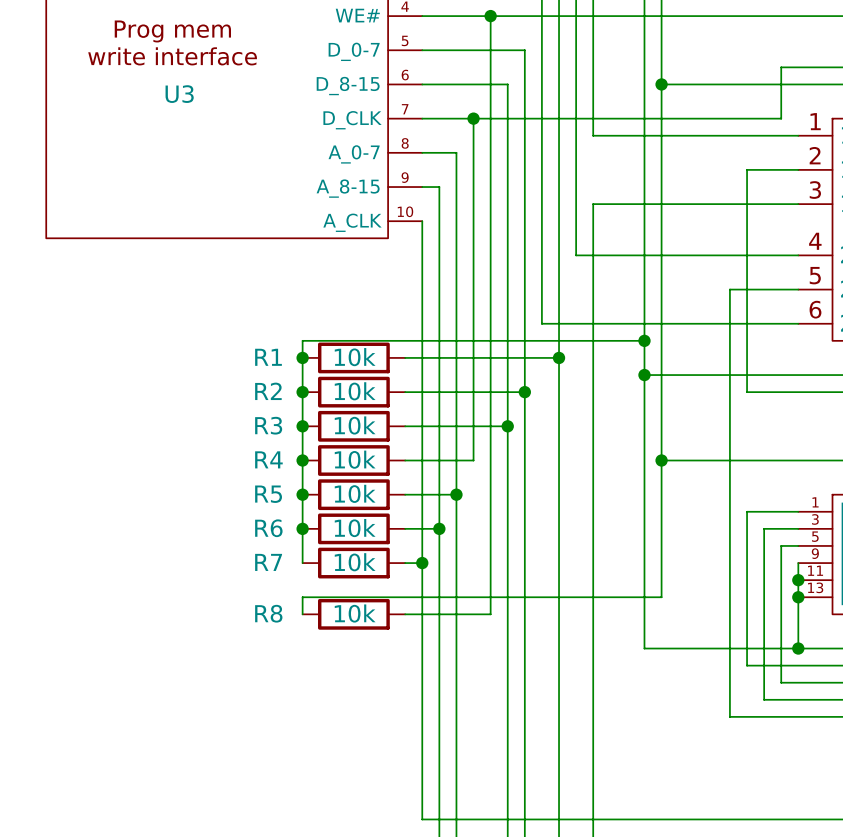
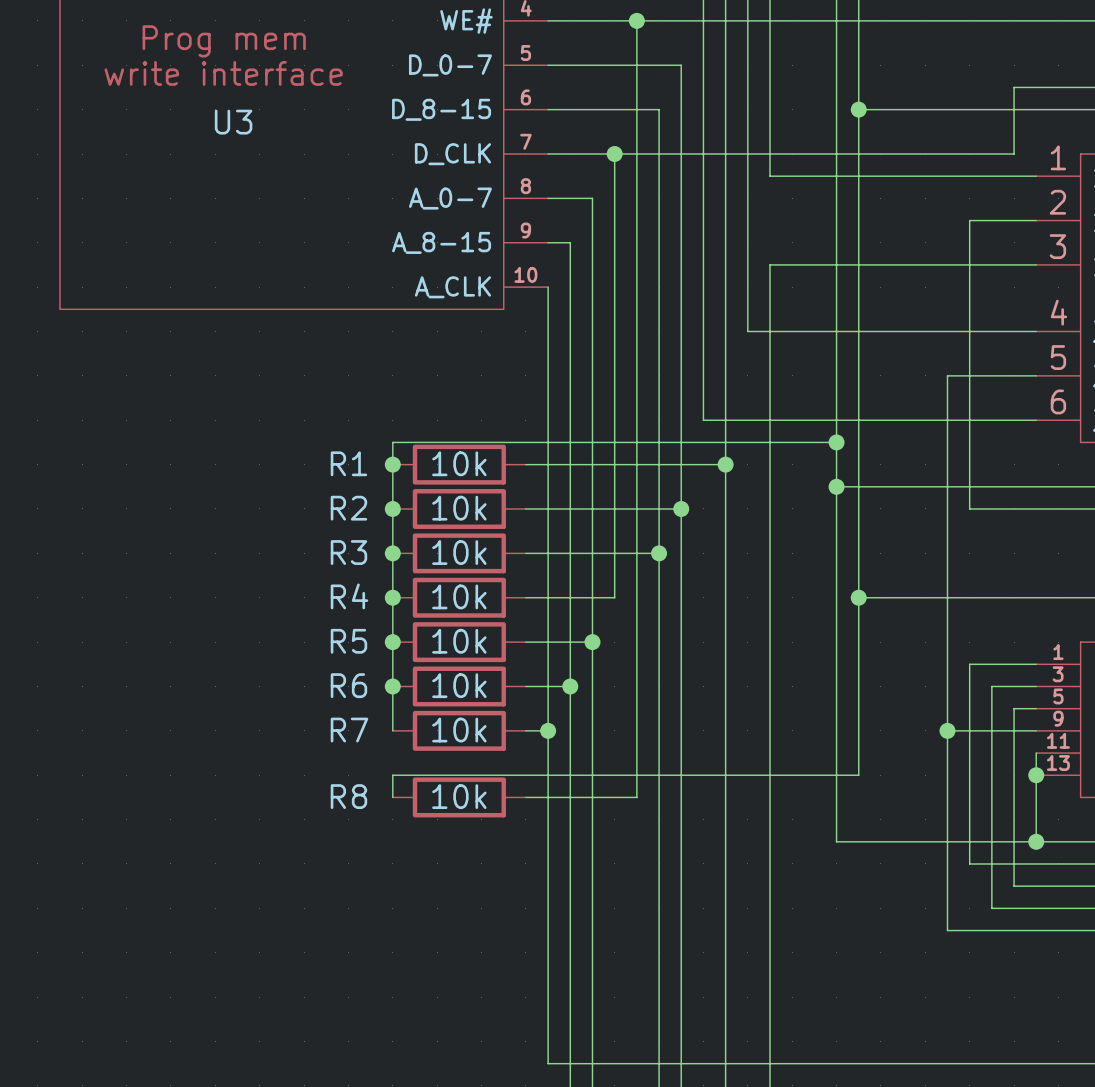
wire: (798, 563) (798, 580) -> (1036, 730) (947, 730)
junction position: (798, 580) -> (947, 730)

